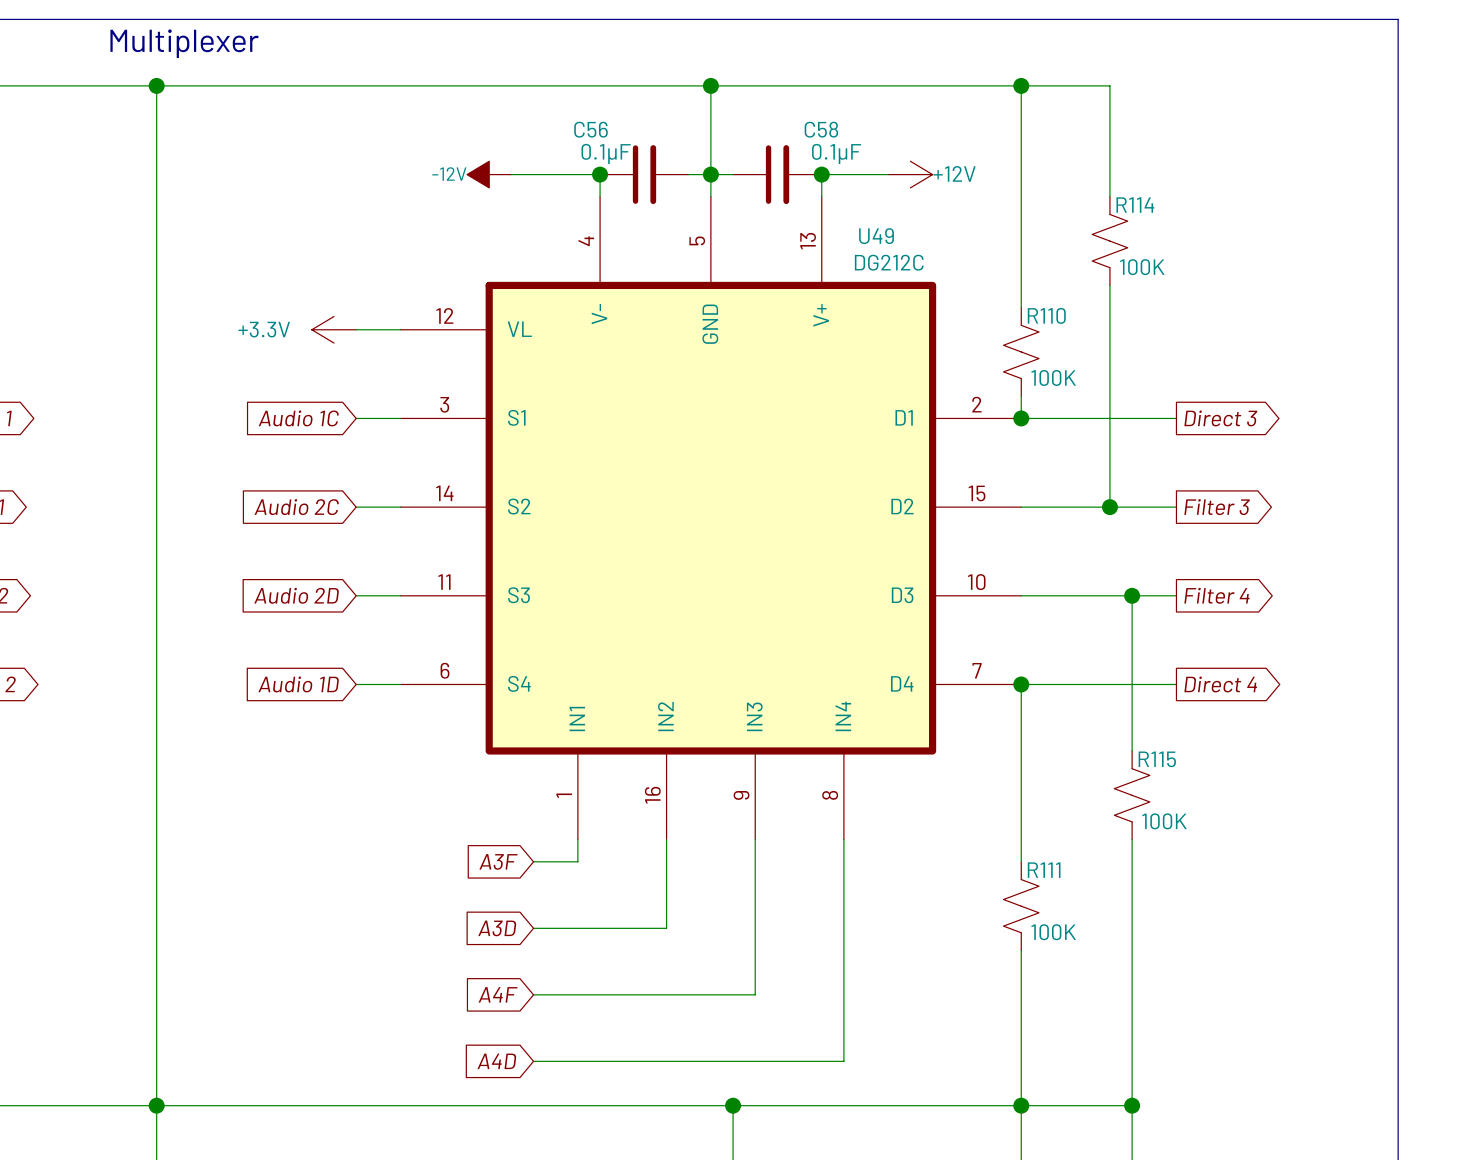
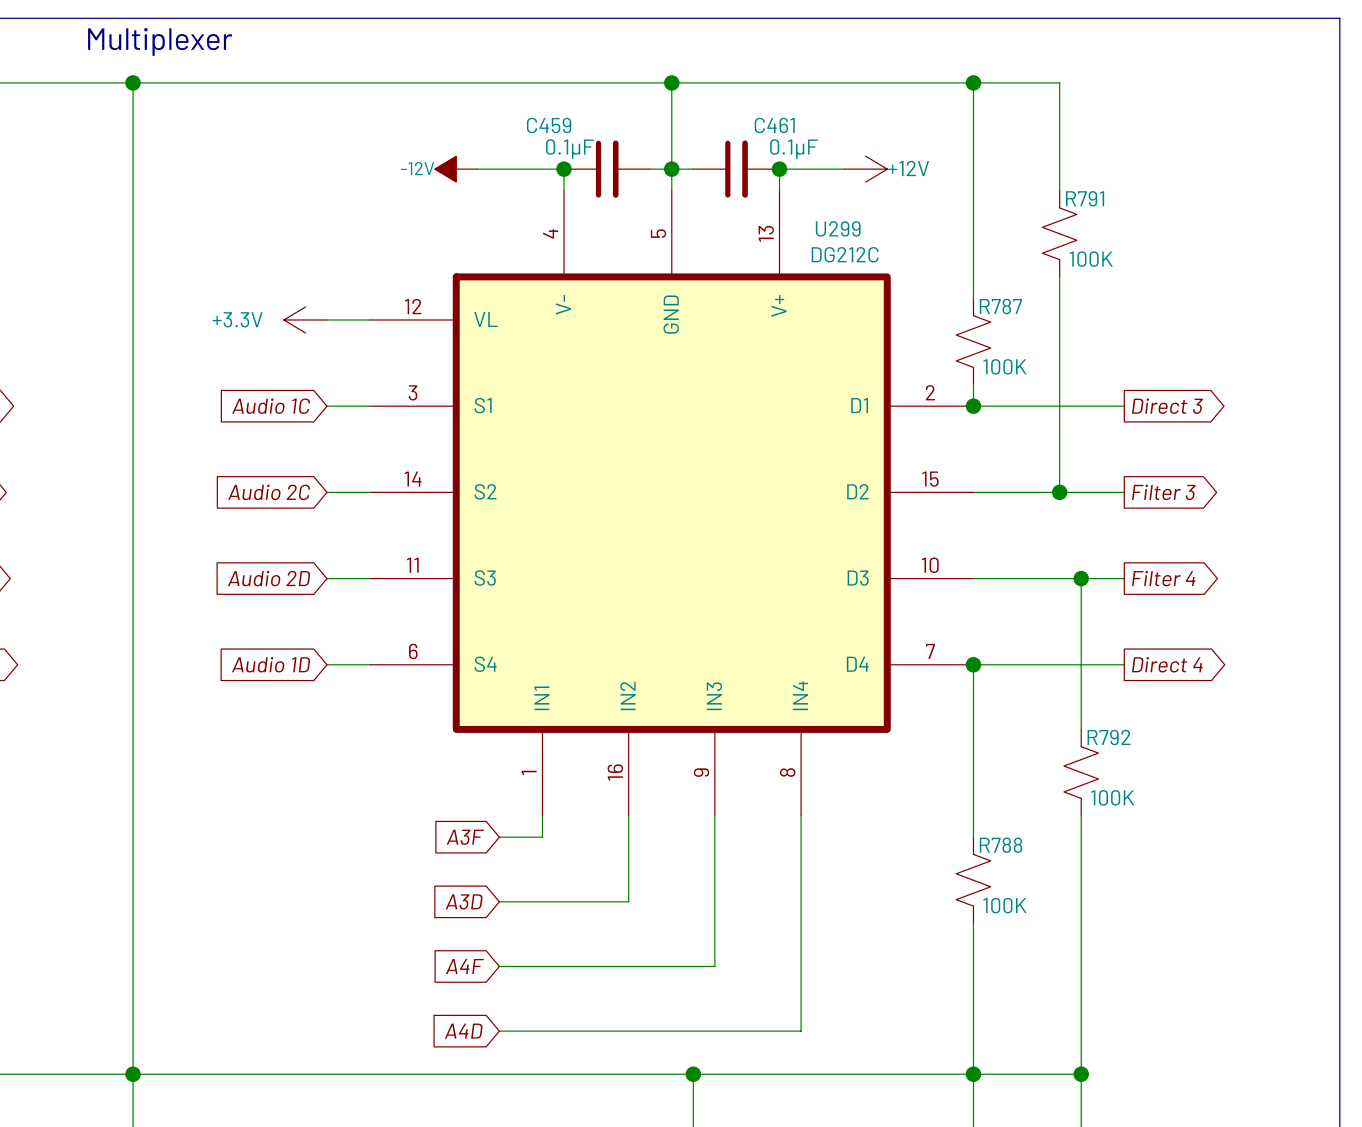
C56 name: C56 (591, 129) -> C459 (549, 125)
C58 name: C58 (821, 129) -> C461 (774, 125)
R114 name: R114 (1135, 205) -> R791 (1085, 198)
U49 name: U49 (876, 236) -> U299 (838, 228)
R110 name: R110 (1046, 315) -> R787 (1000, 306)
R115 name: R115 (1157, 759) -> R792 (1108, 737)
R111 name: R111 (1044, 870) -> R788 (1001, 845)

